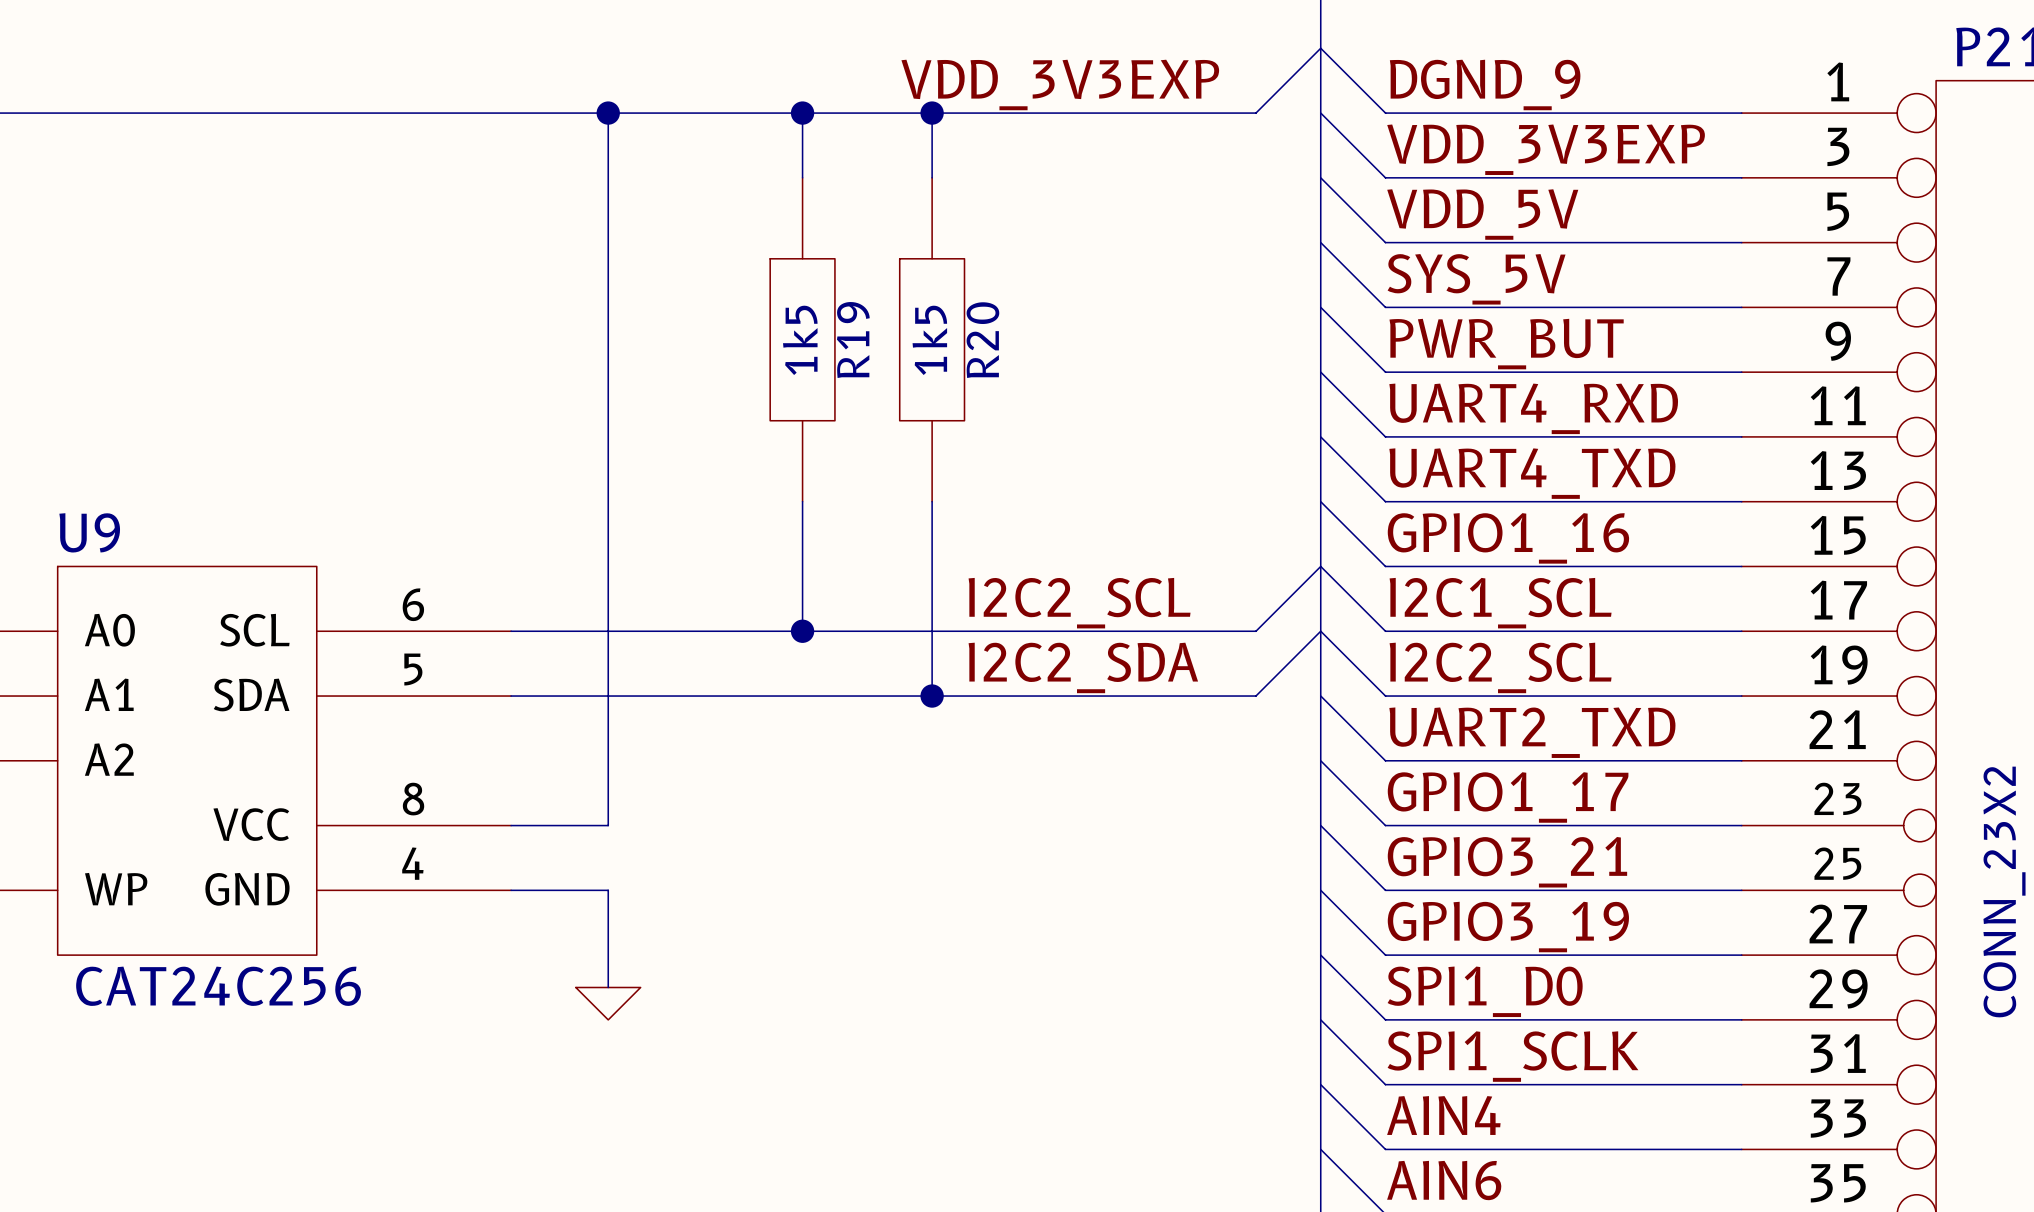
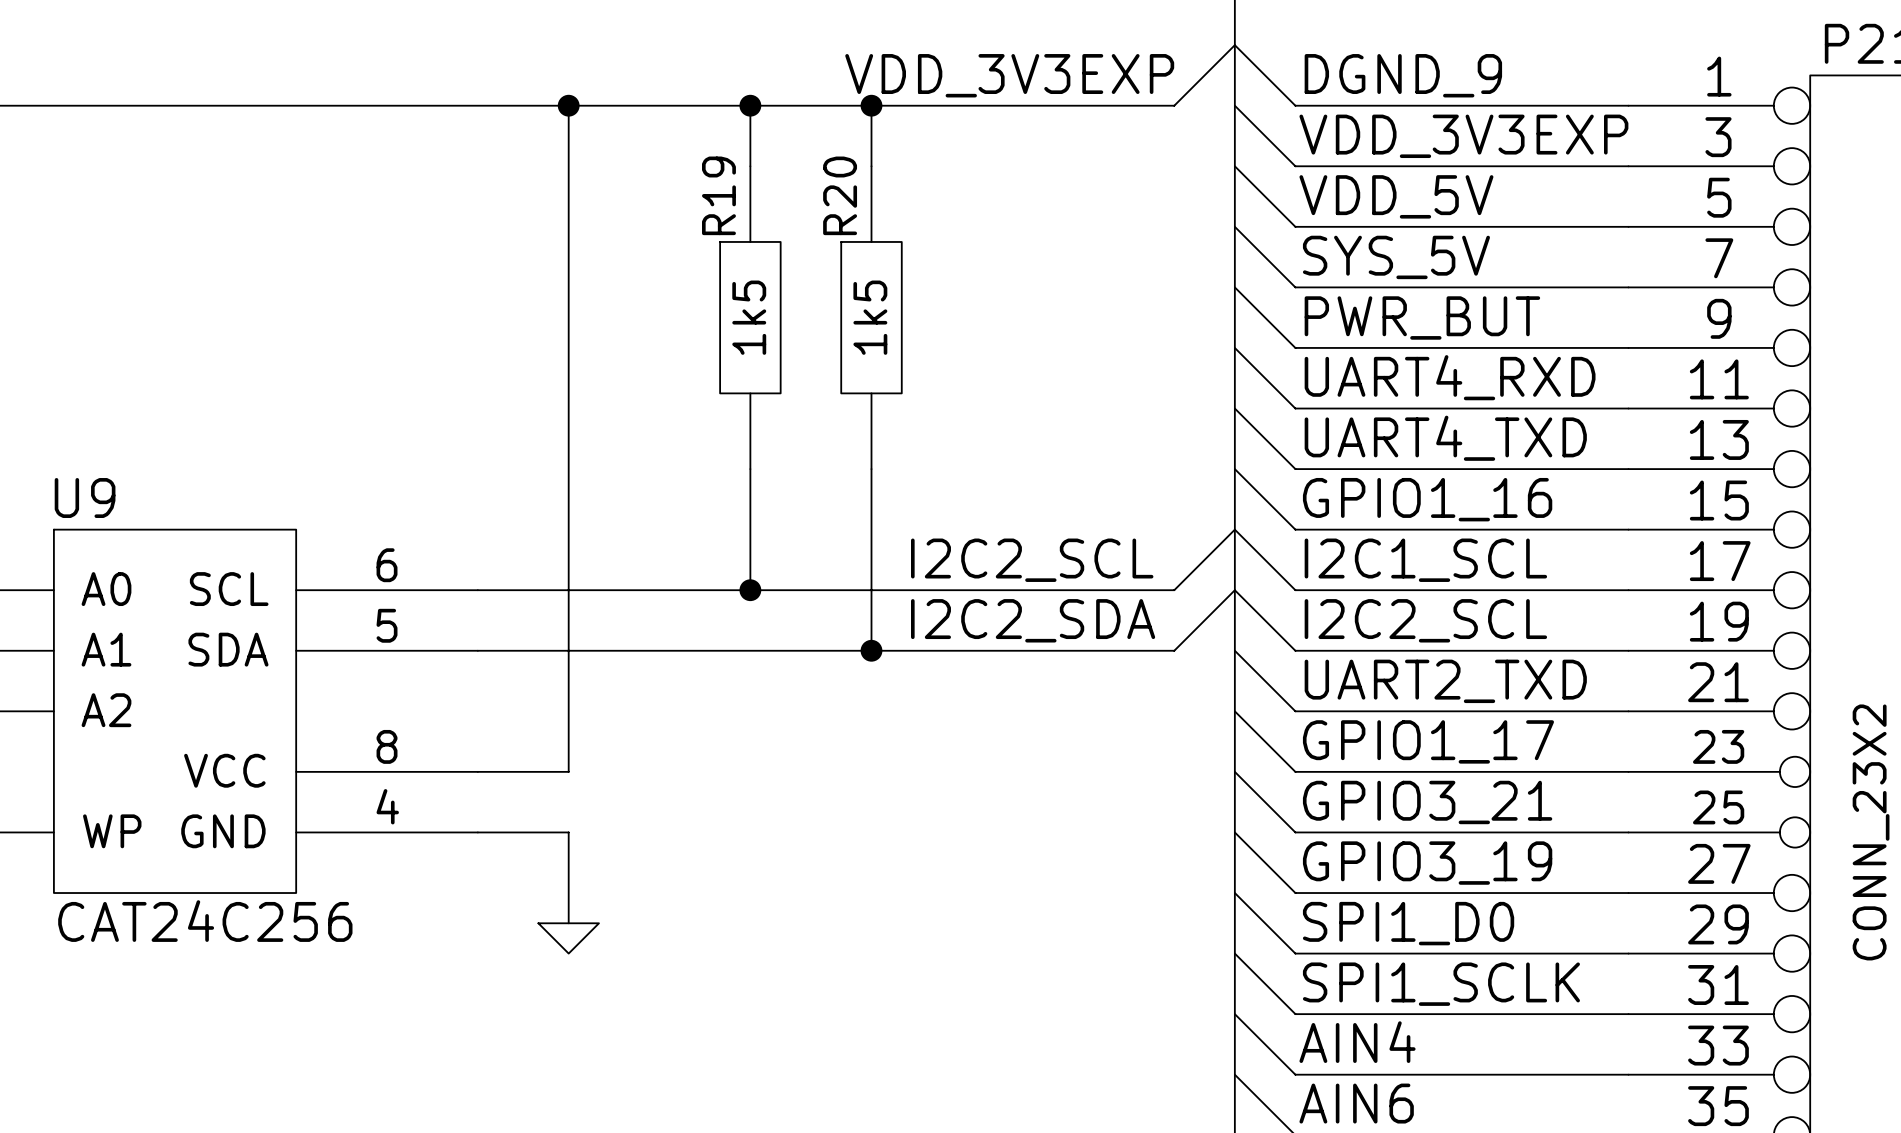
R19 name position: R19 (853, 340) -> R19 (718, 195)
R20 name position: R20 (982, 340) -> R20 (840, 195)

